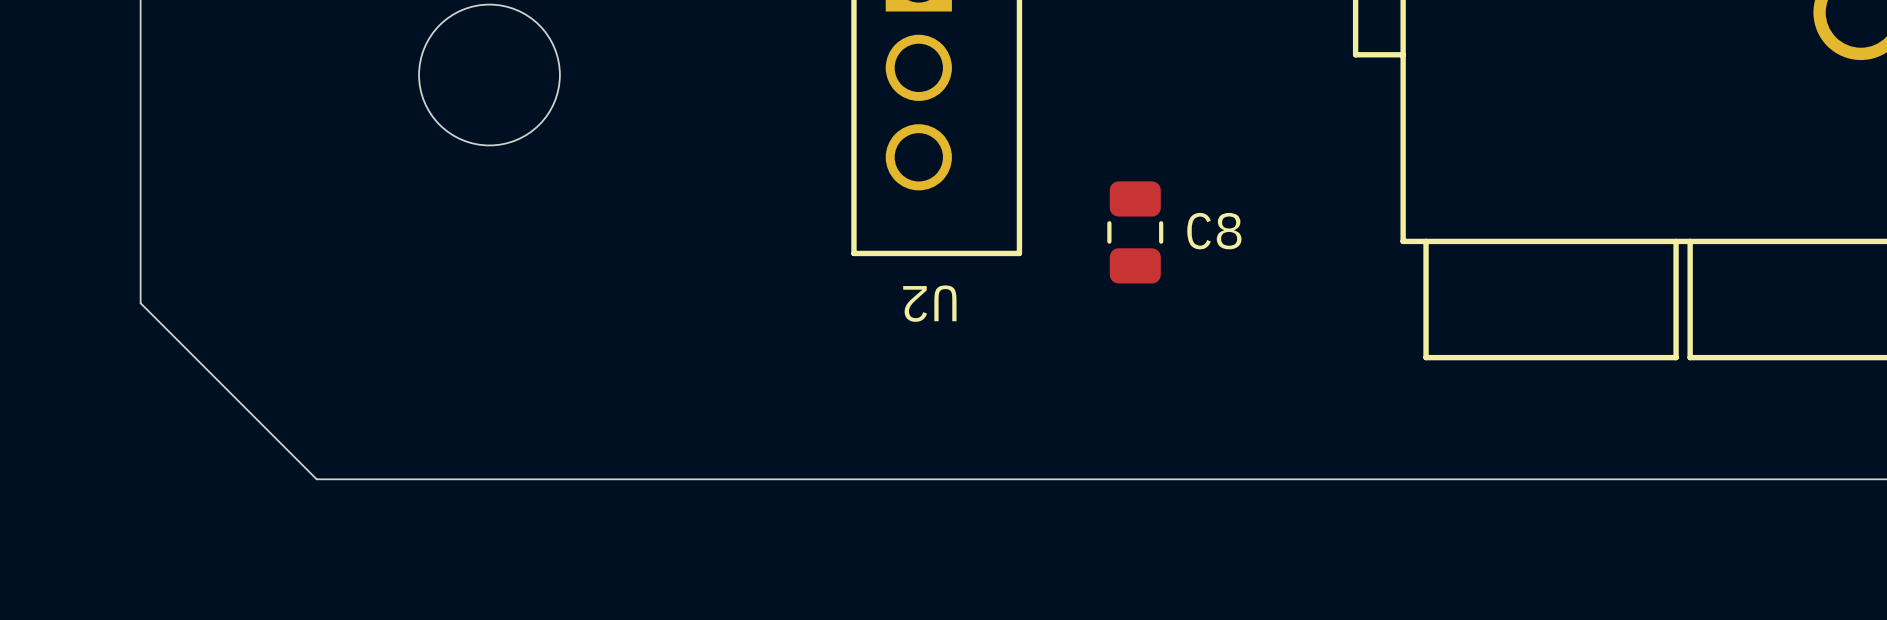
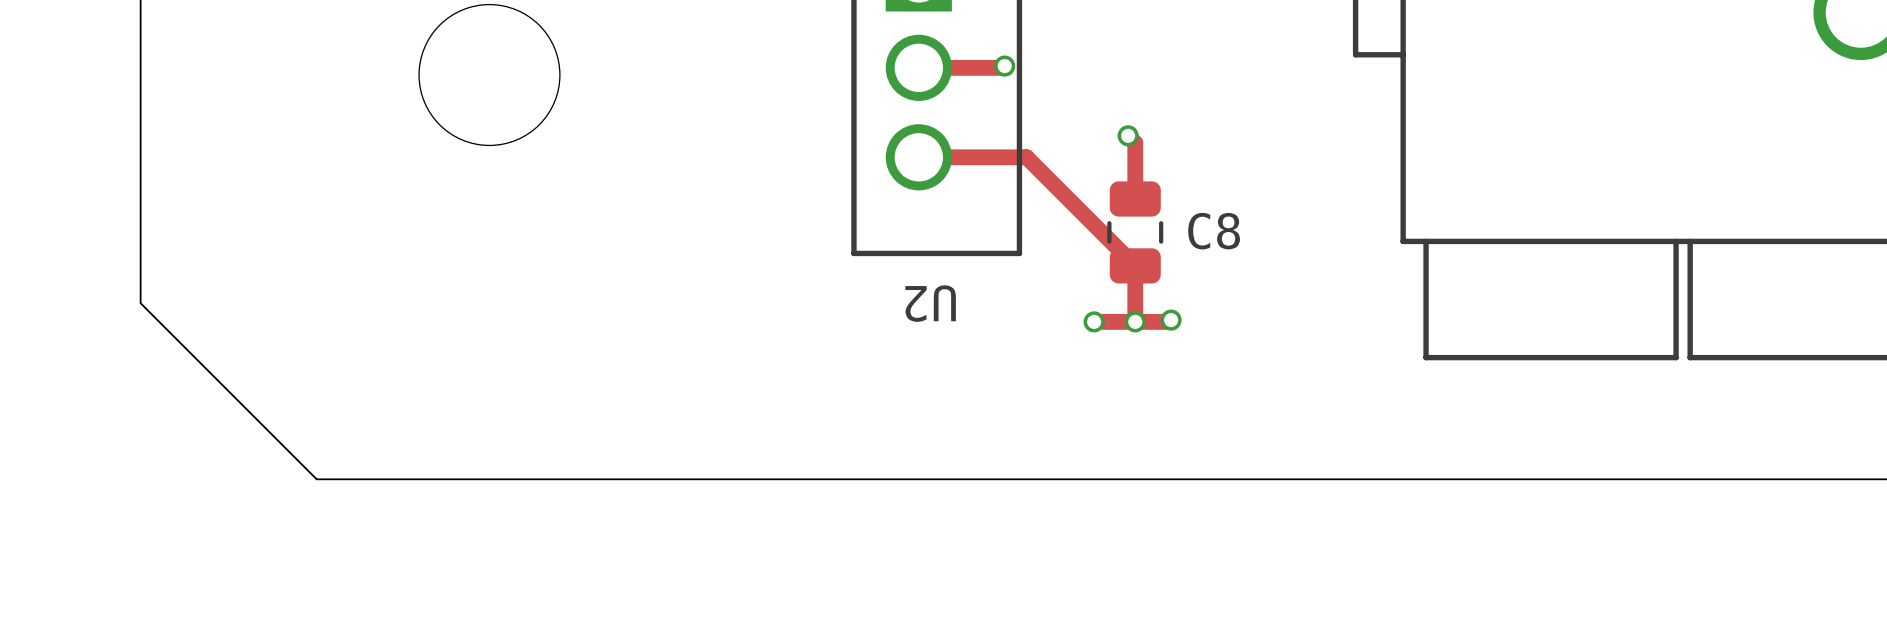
top track: none -> (1004, 66) (1002, 67) (918, 67)
via: none -> (1004, 66)
top track: none -> (1128, 135) (1135, 142) (1135, 198)
via: none -> (1128, 135)
top track: none -> (918, 157) (1026, 157) (1135, 265) (1135, 321)
top track: none -> (1171, 320) (1169, 321) (1094, 321)
via: none -> (1171, 320)
via: none -> (1094, 321)
via: none -> (1135, 321)

